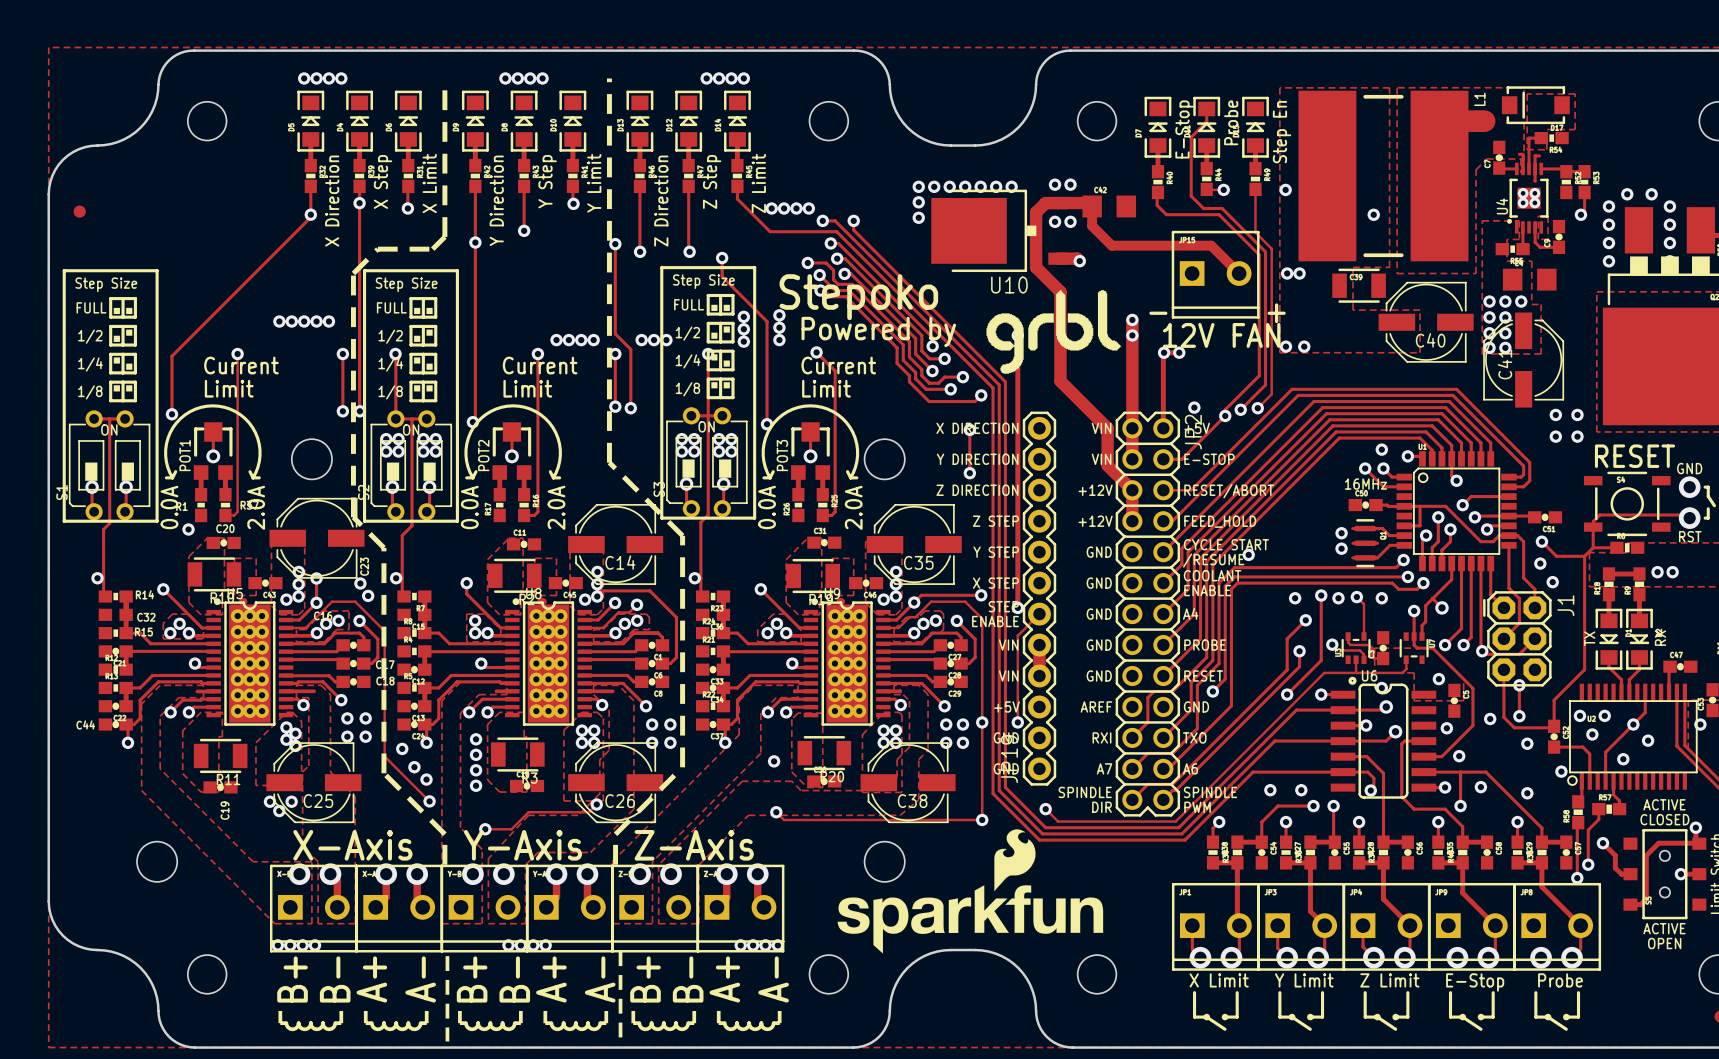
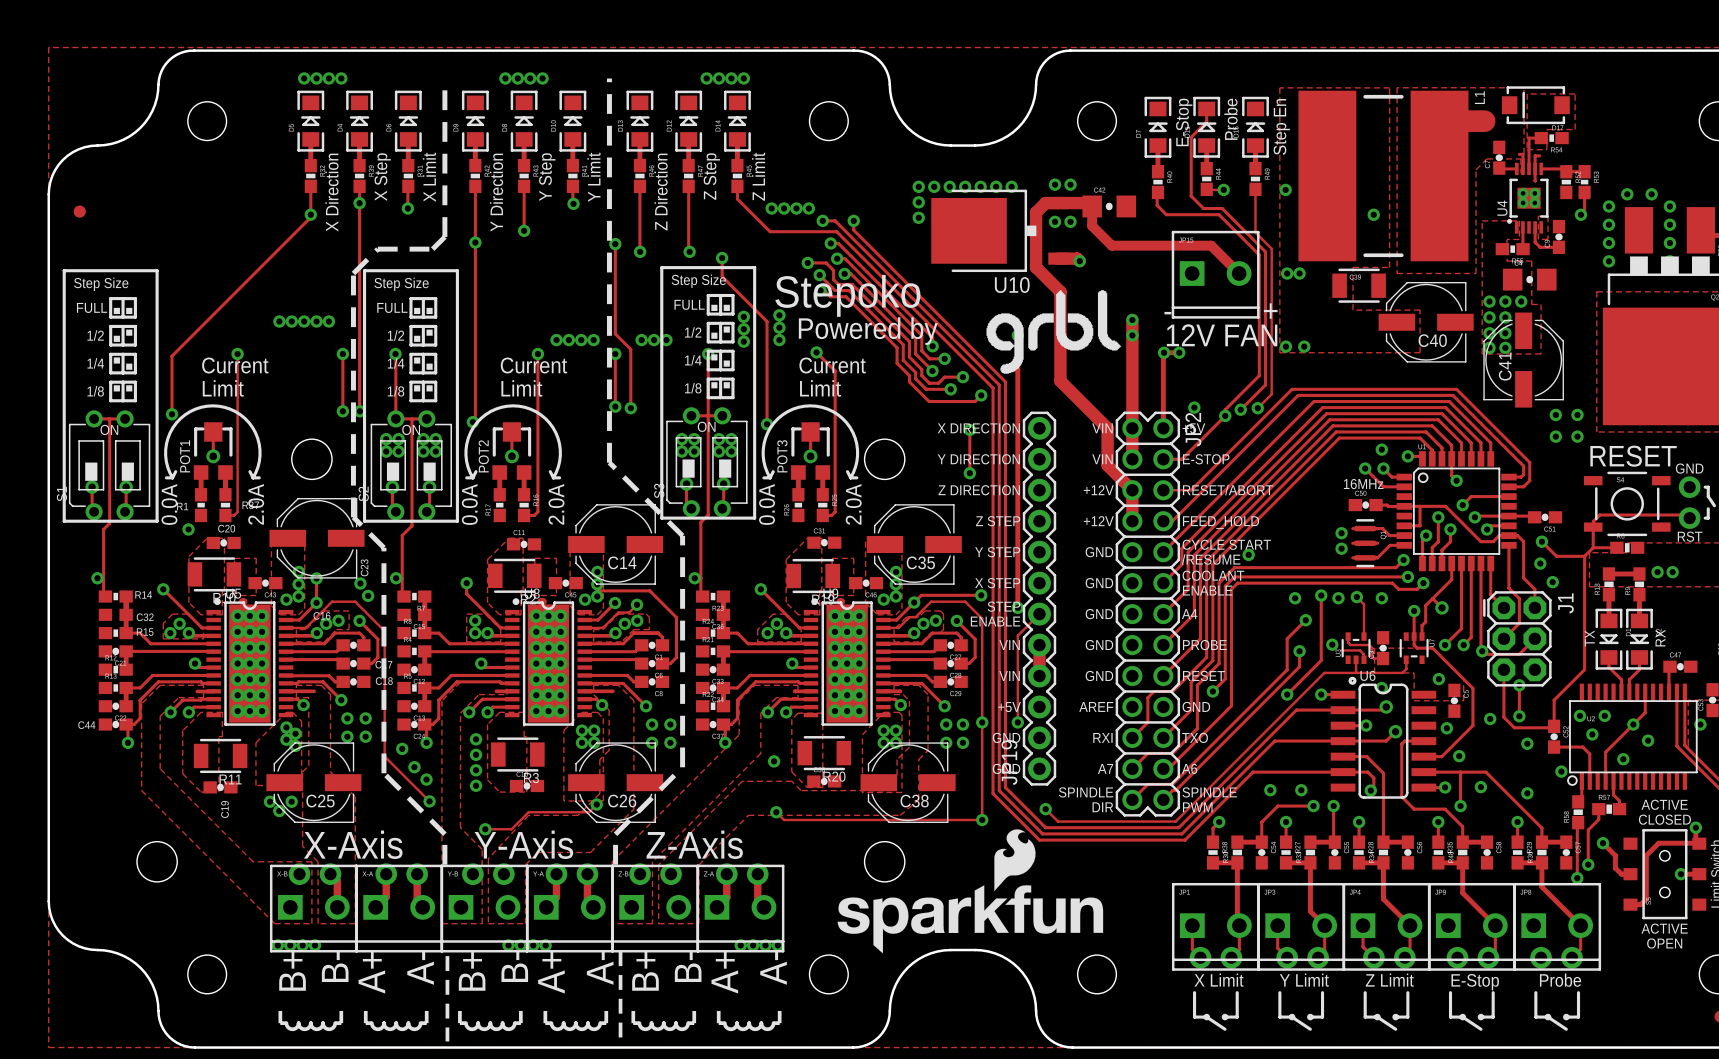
part footprint: [1082, 195, 1137, 218] -> [1082, 195, 1137, 218]
part footprint: [1502, 268, 1557, 291] -> [1502, 268, 1557, 291]

